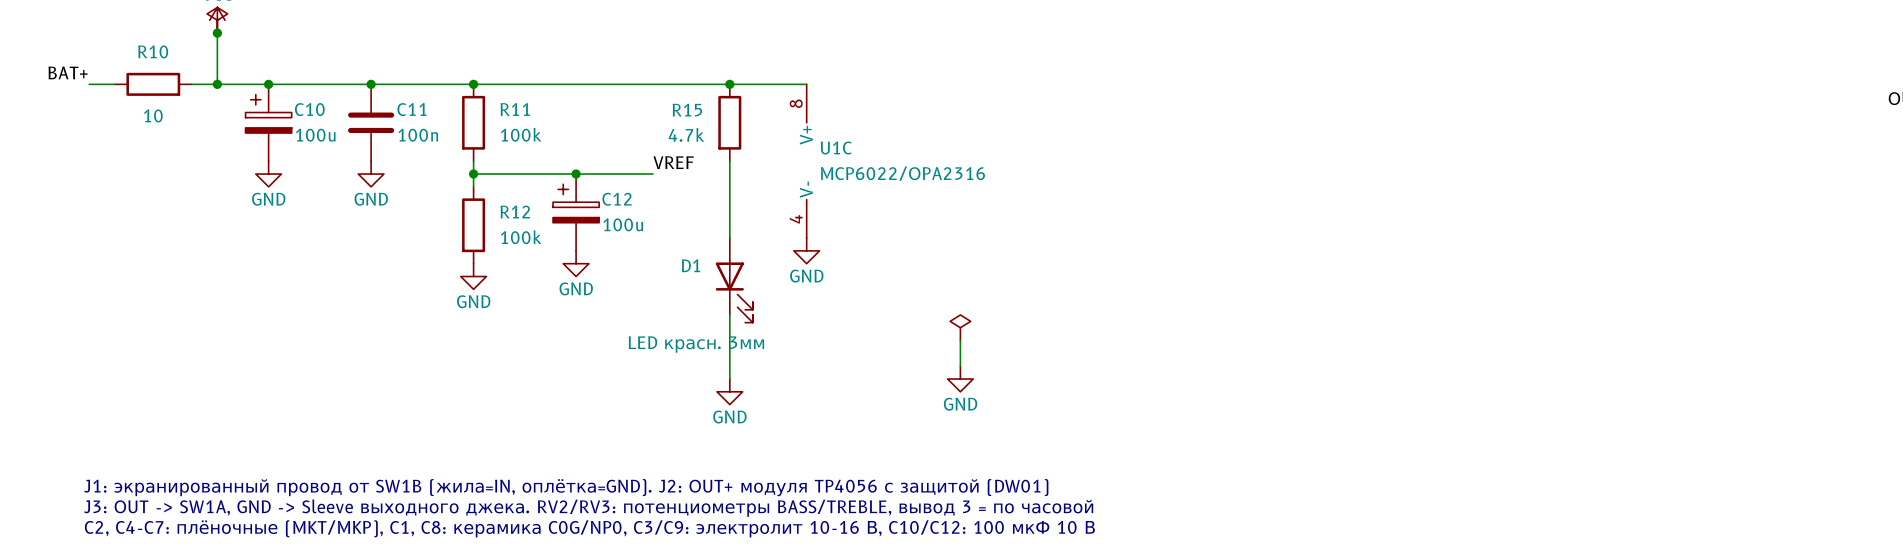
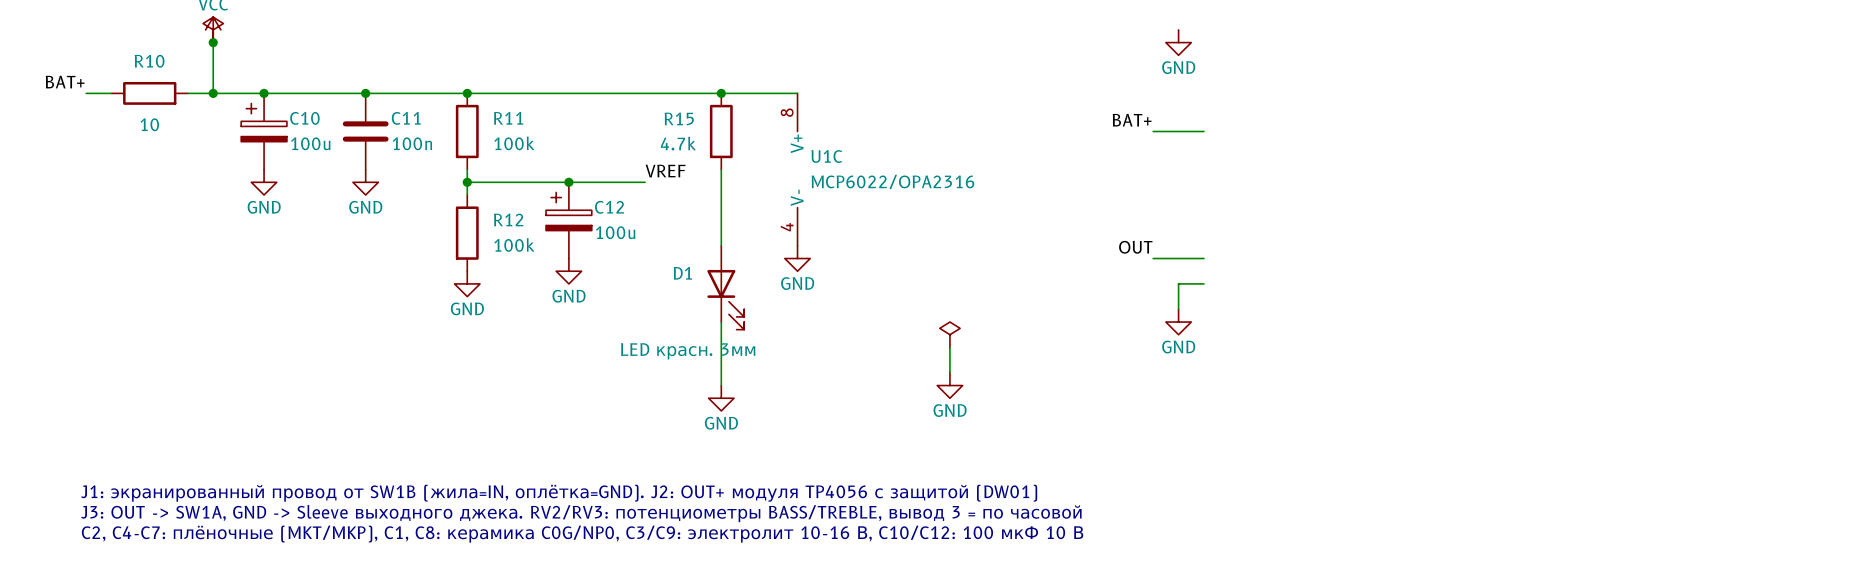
power symbol: none -> GND (1178, 42)
label: none -> BAT+ (1132, 120)
wire: none -> (1153, 131) (1203, 131)
label: none -> OUT (1135, 247)
wire: none -> (1153, 258) (1203, 258)
wire: none -> (1203, 283) (1178, 283) (1178, 309)
power symbol: none -> GND (1178, 322)

